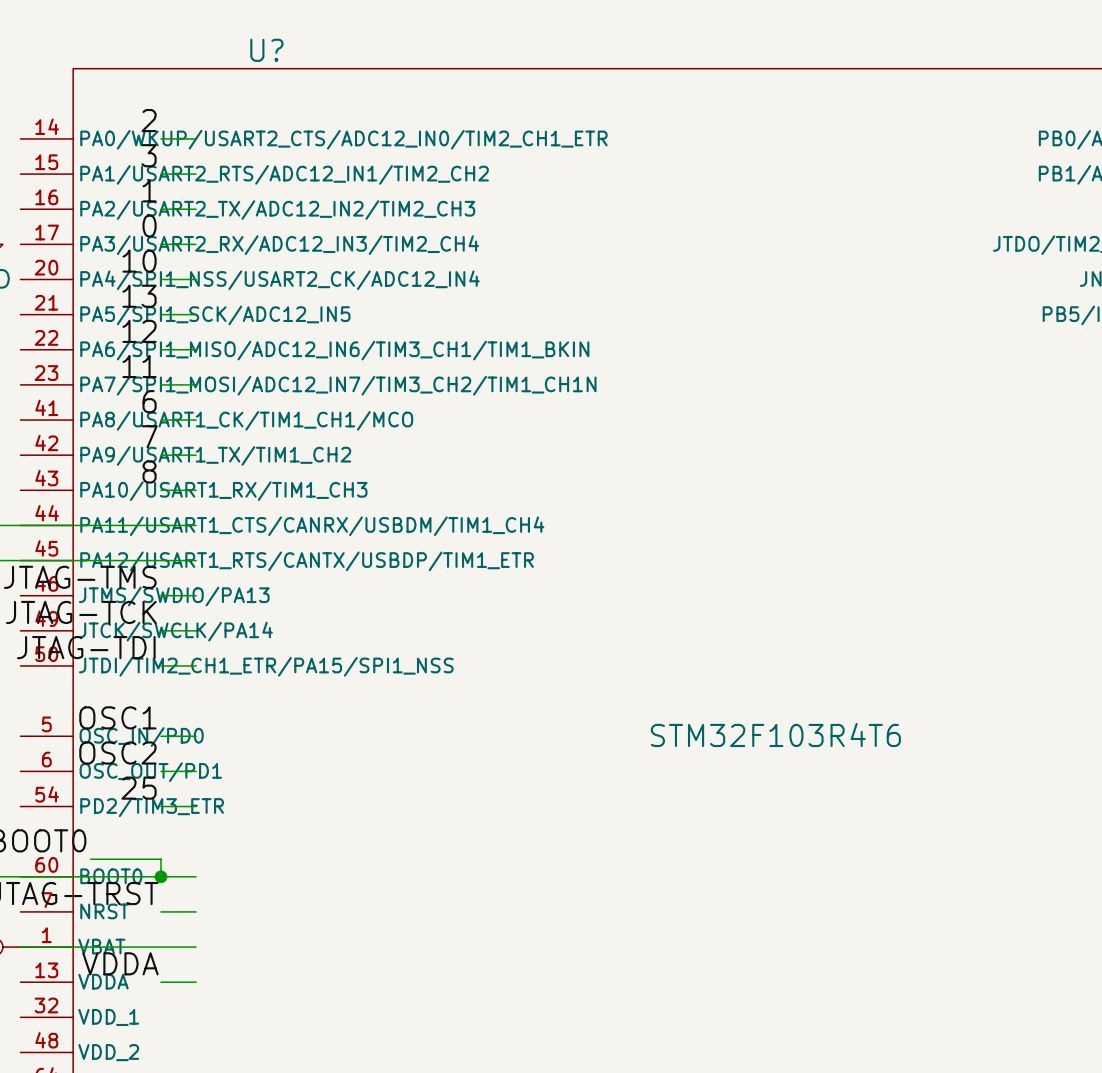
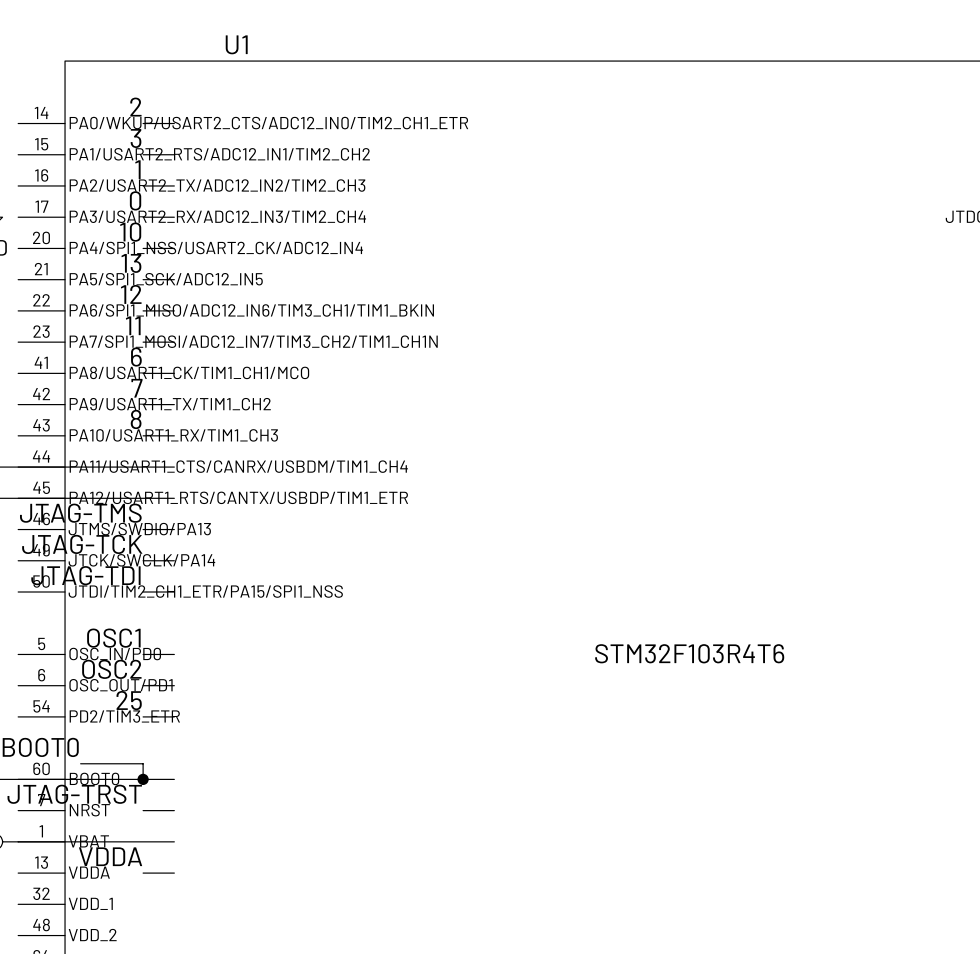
U? name: U? (266, 50) -> U1 (236, 44)

